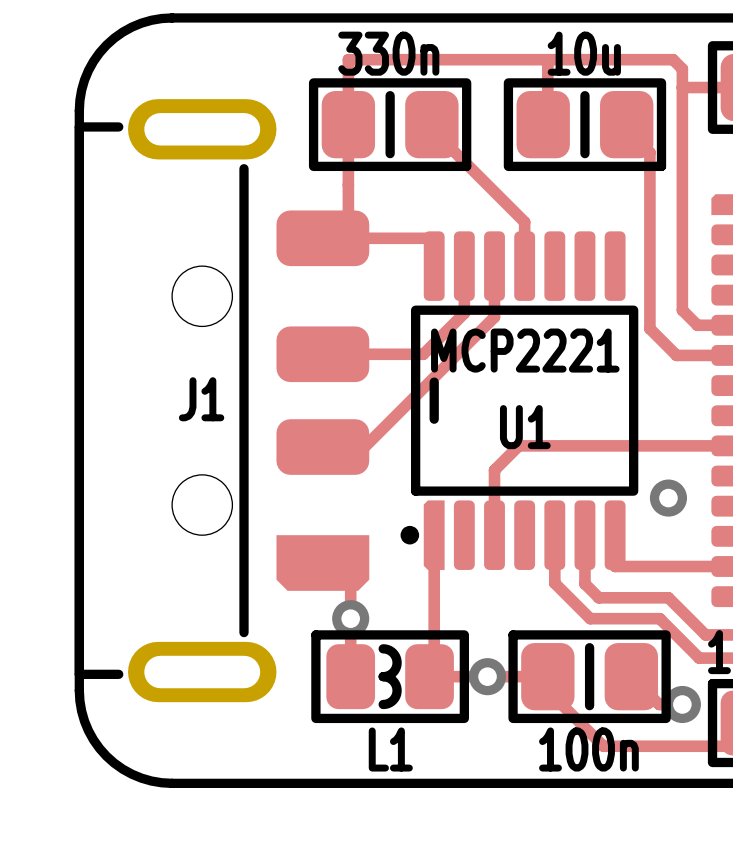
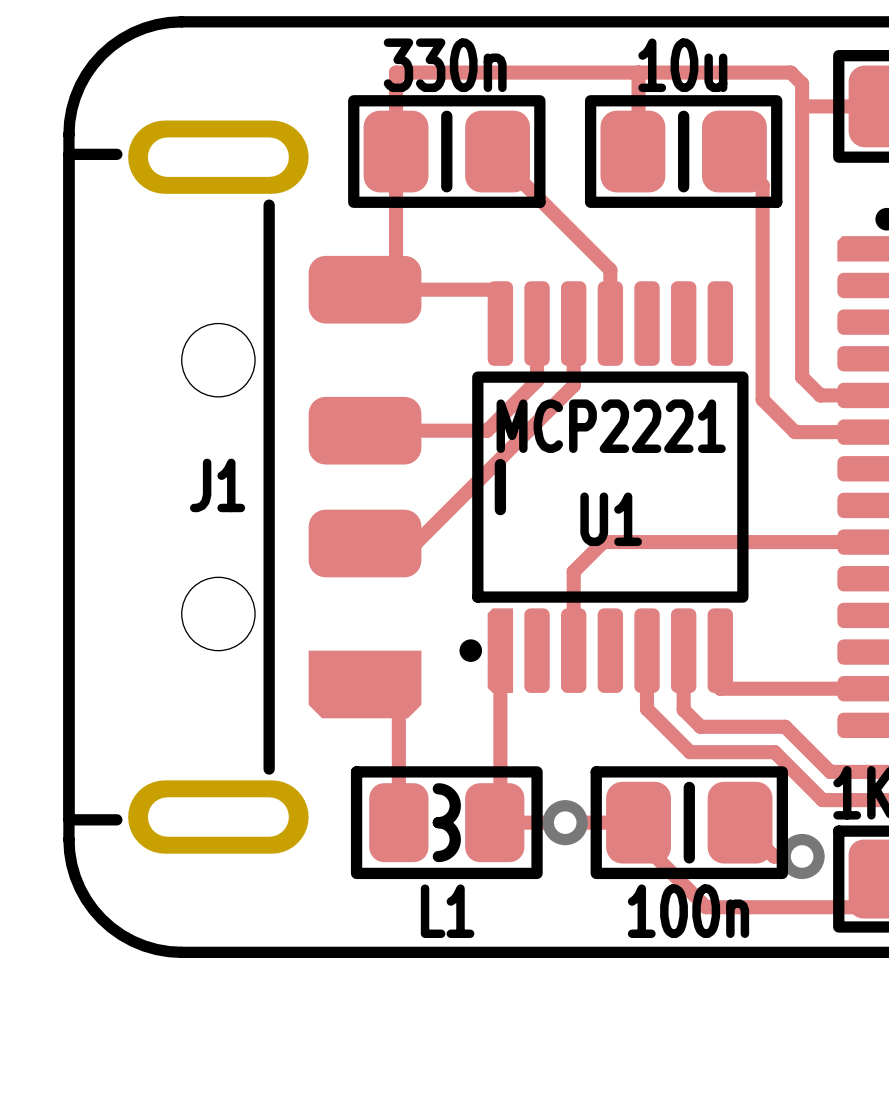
via: (668, 498) -> none
via: (350, 618) -> none

